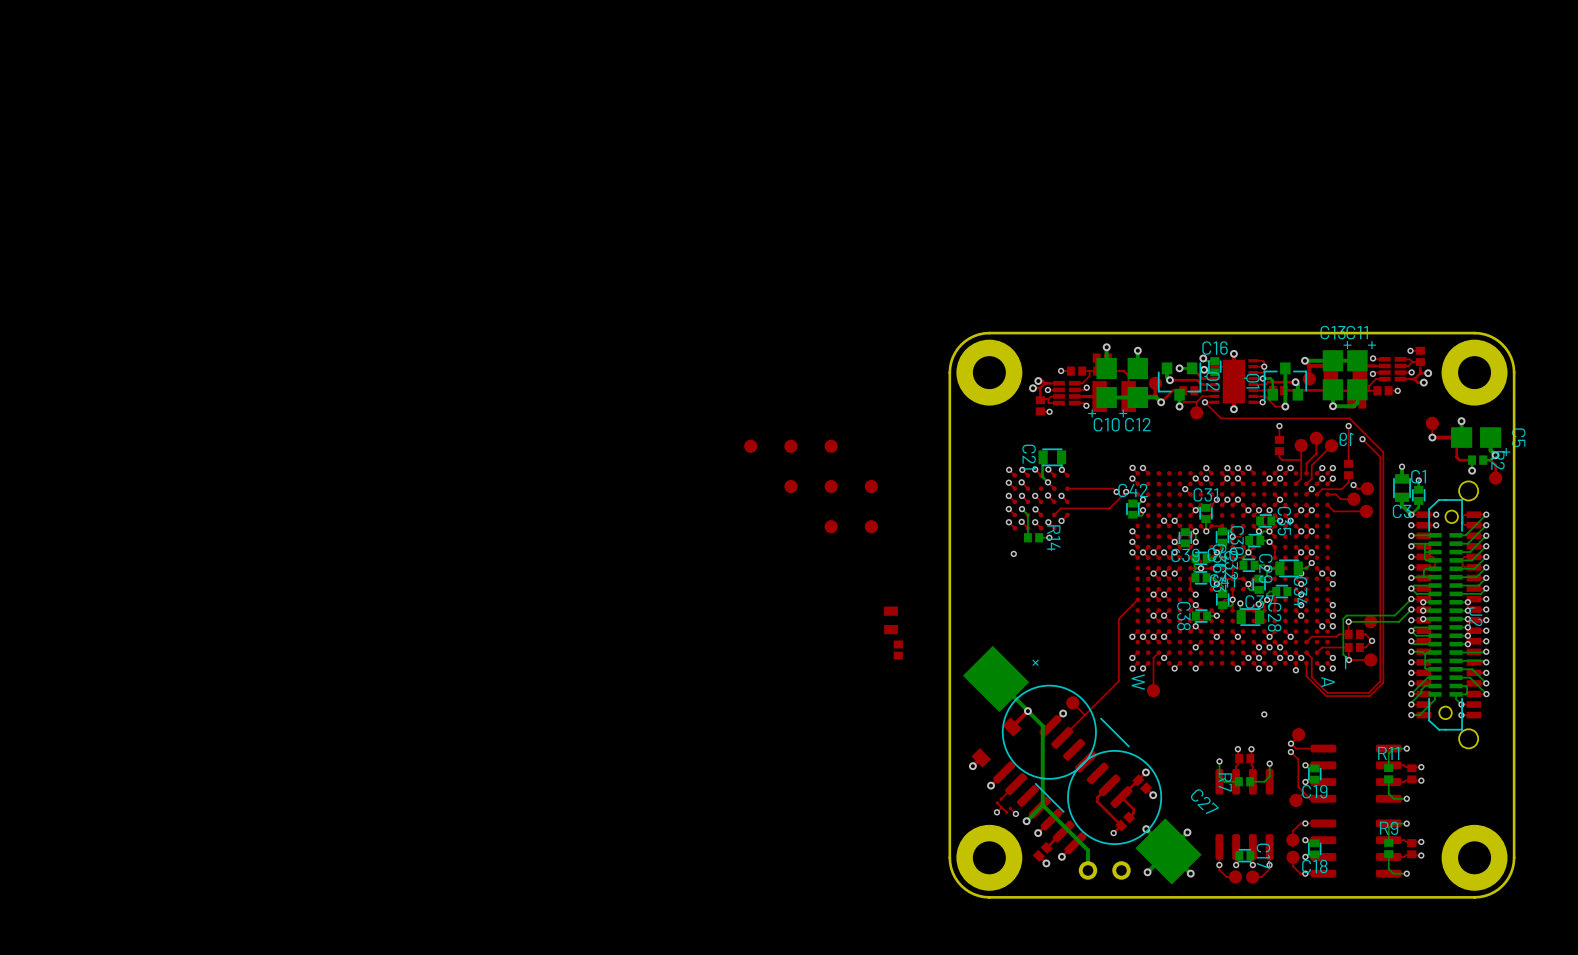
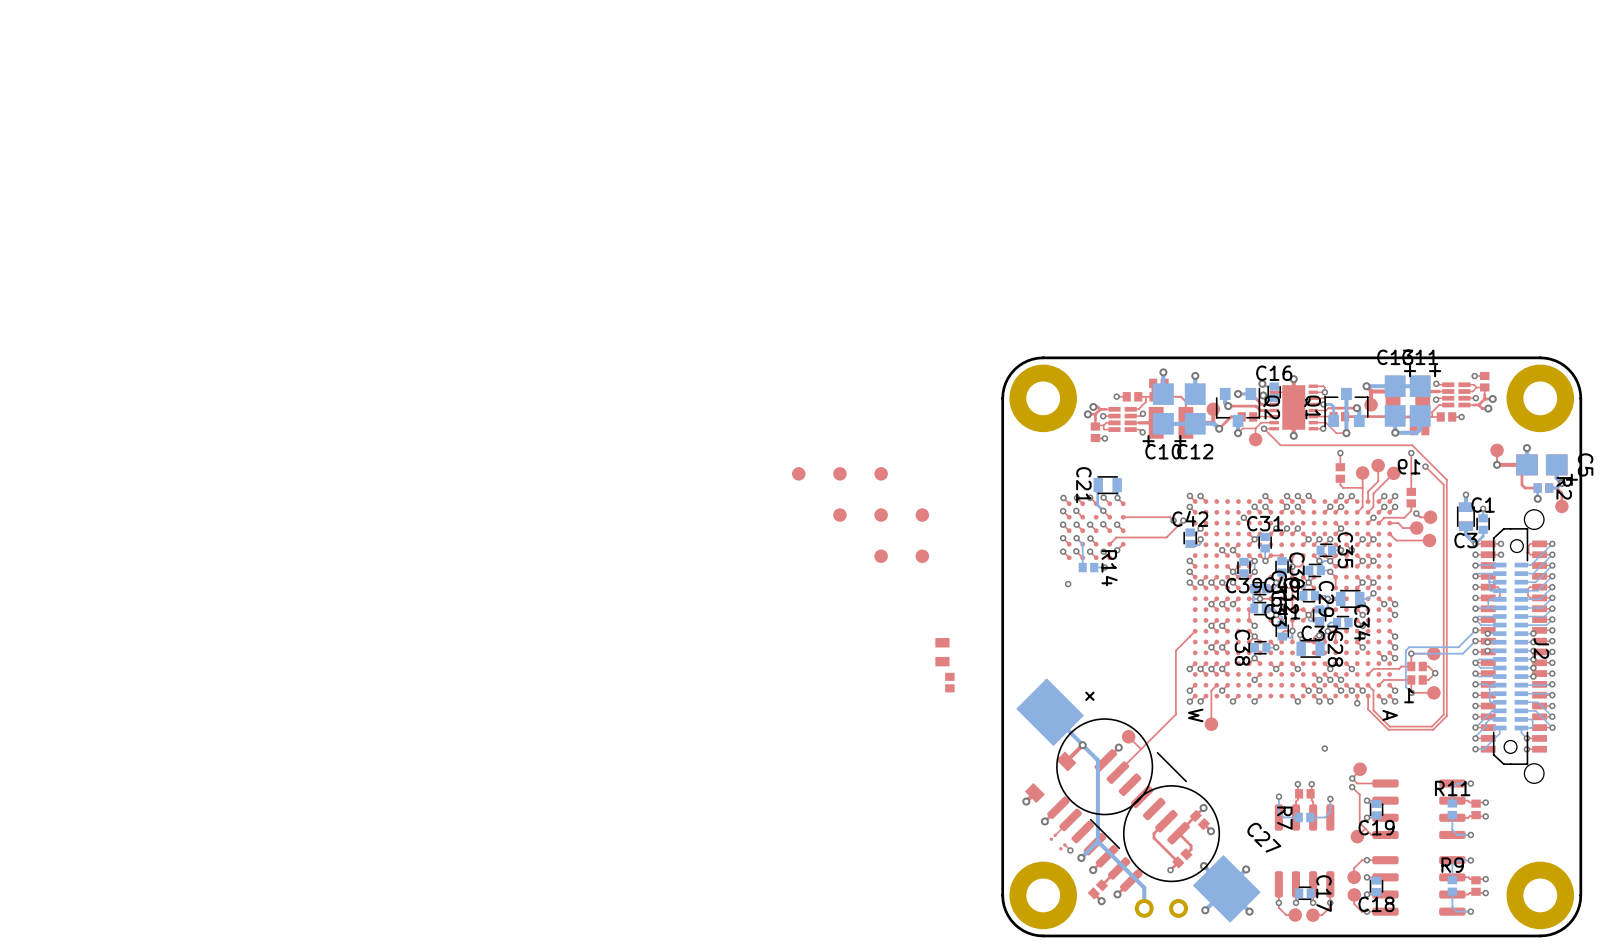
top track: (997, 802) (1006, 812) -> none
top track: (1001, 807) (996, 812) -> none
via: (996, 812) -> none

